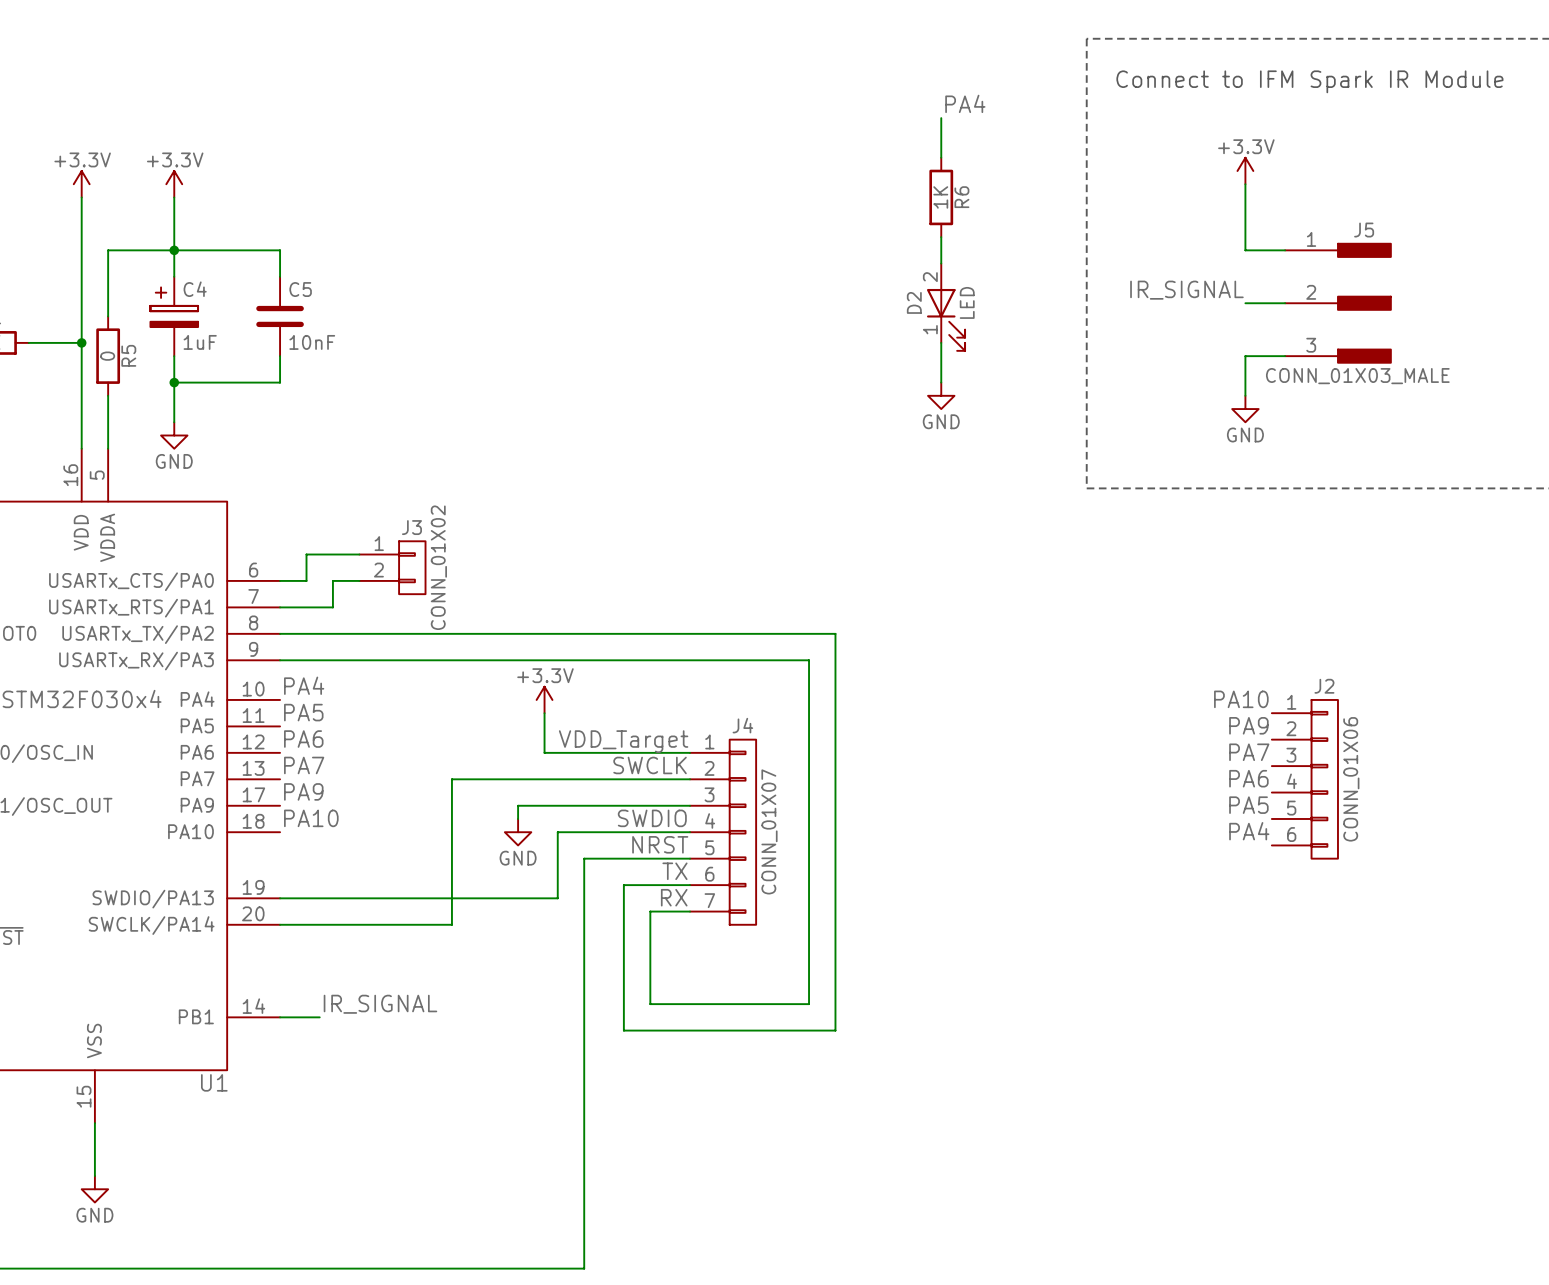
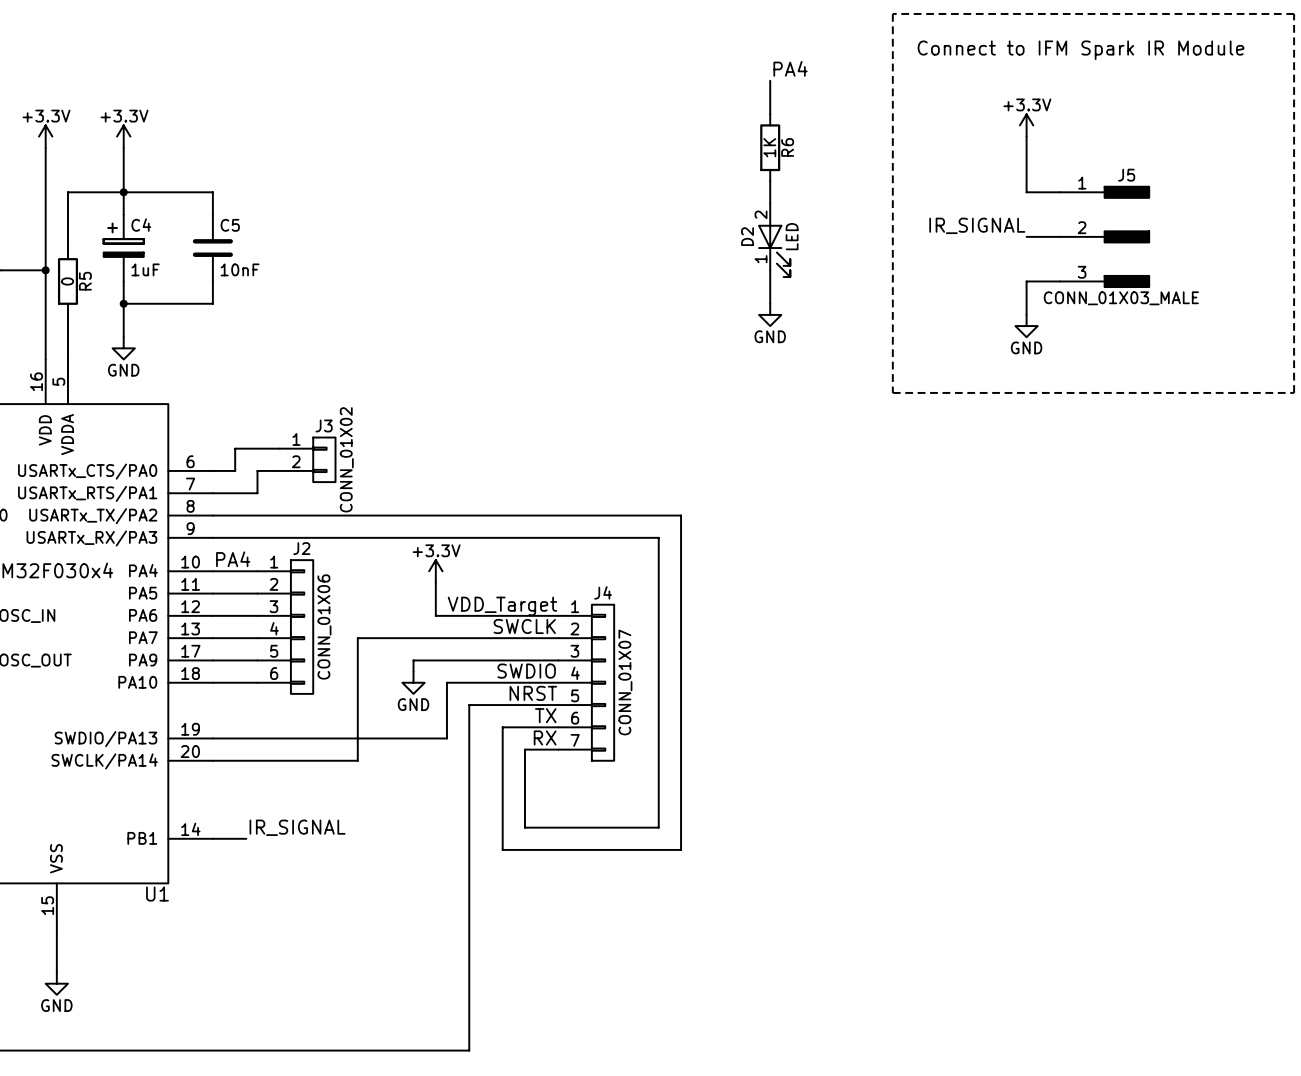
wire: none -> (212, 571) (257, 571)
label: PA10 (1241, 699) -> none
label: PA5 (303, 712) -> none
label: PA9 (1248, 725) -> none
wire: none -> (212, 593) (257, 593)
label: PA6 (303, 739) -> none
wire: none -> (212, 615) (257, 615)
label: PA7 (1249, 752) -> none
label: PA7 (304, 765) -> none
label: PA6 (1248, 778) -> none
wire: none -> (212, 638) (257, 638)
J2 position: (1304, 779) -> (285, 627)
label: PA9 (303, 791) -> none
wire: none -> (212, 660) (257, 660)
label: PA5 (1248, 805) -> none
label: PA10 (311, 818) -> none
label: PA4 (1249, 831) -> none
wire: none -> (212, 682) (257, 682)

